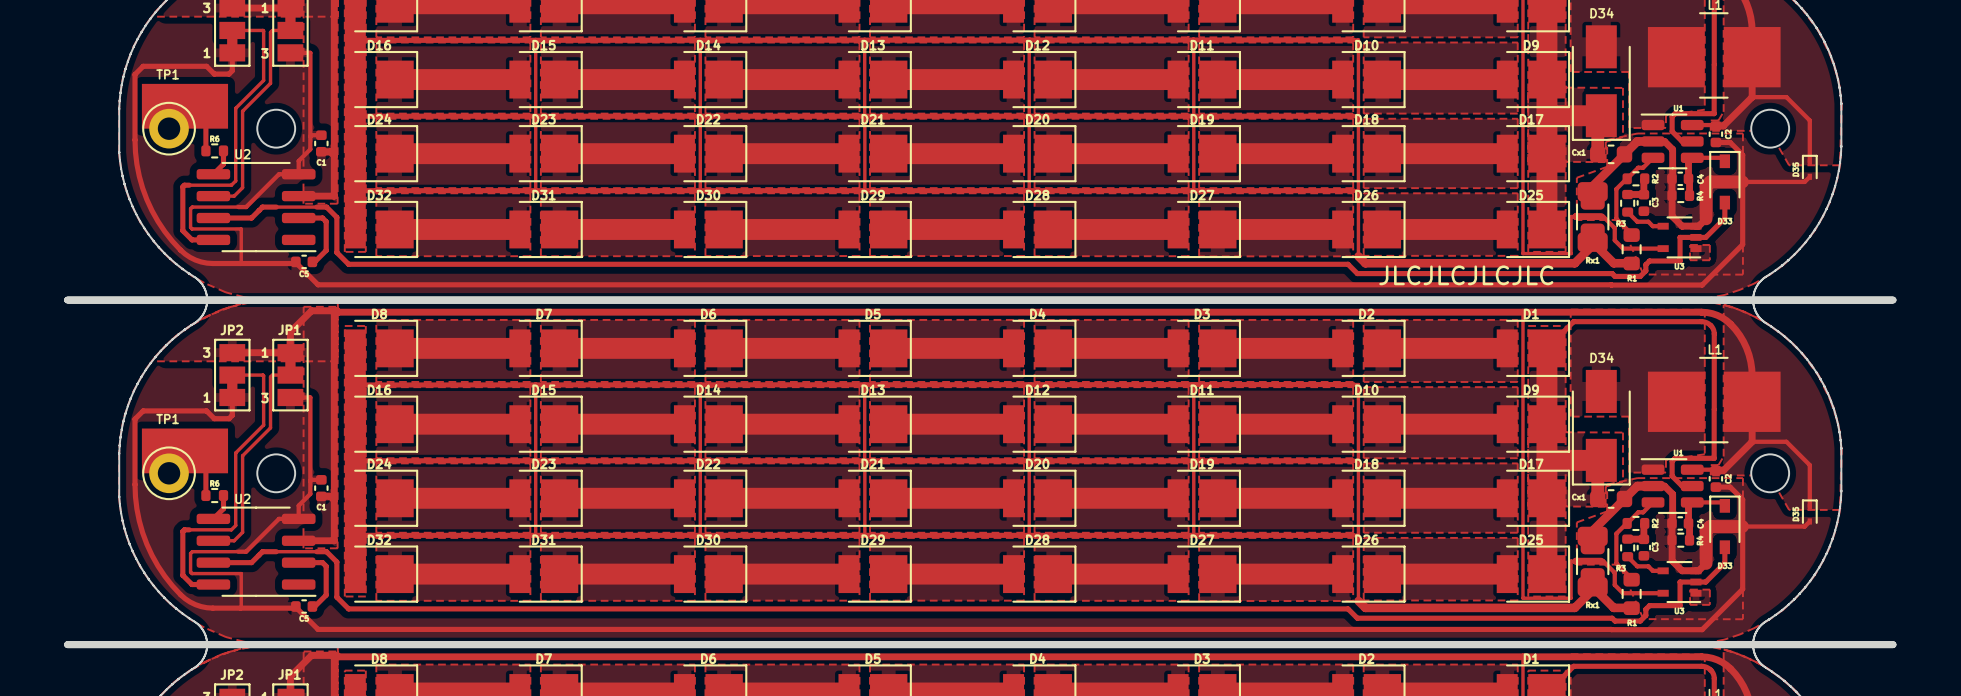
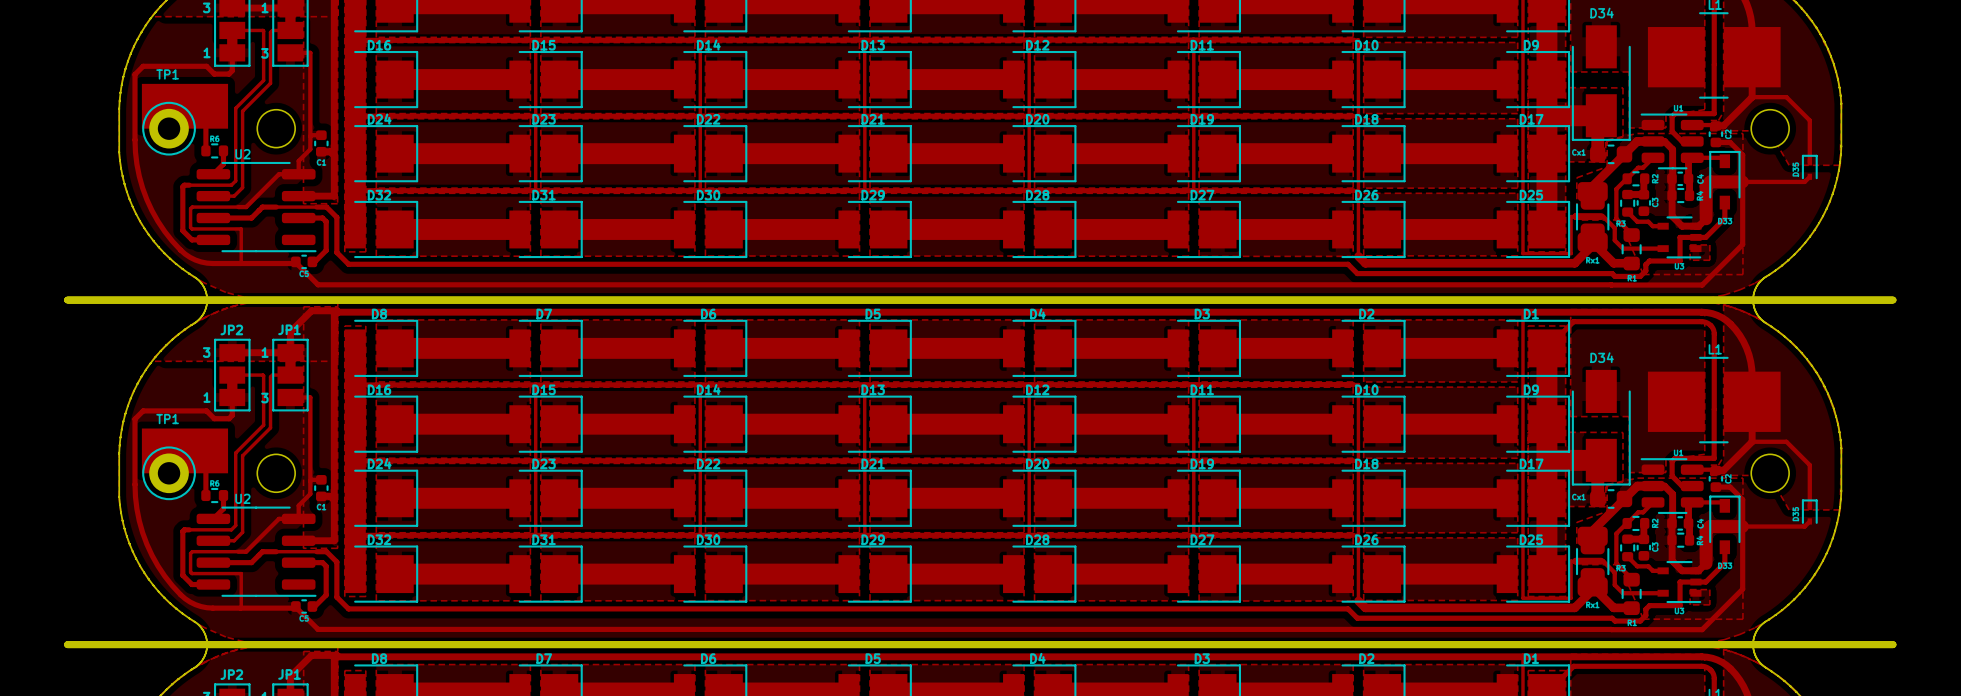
text: JLCJLCJLCJLC (1466, 275) -> none

